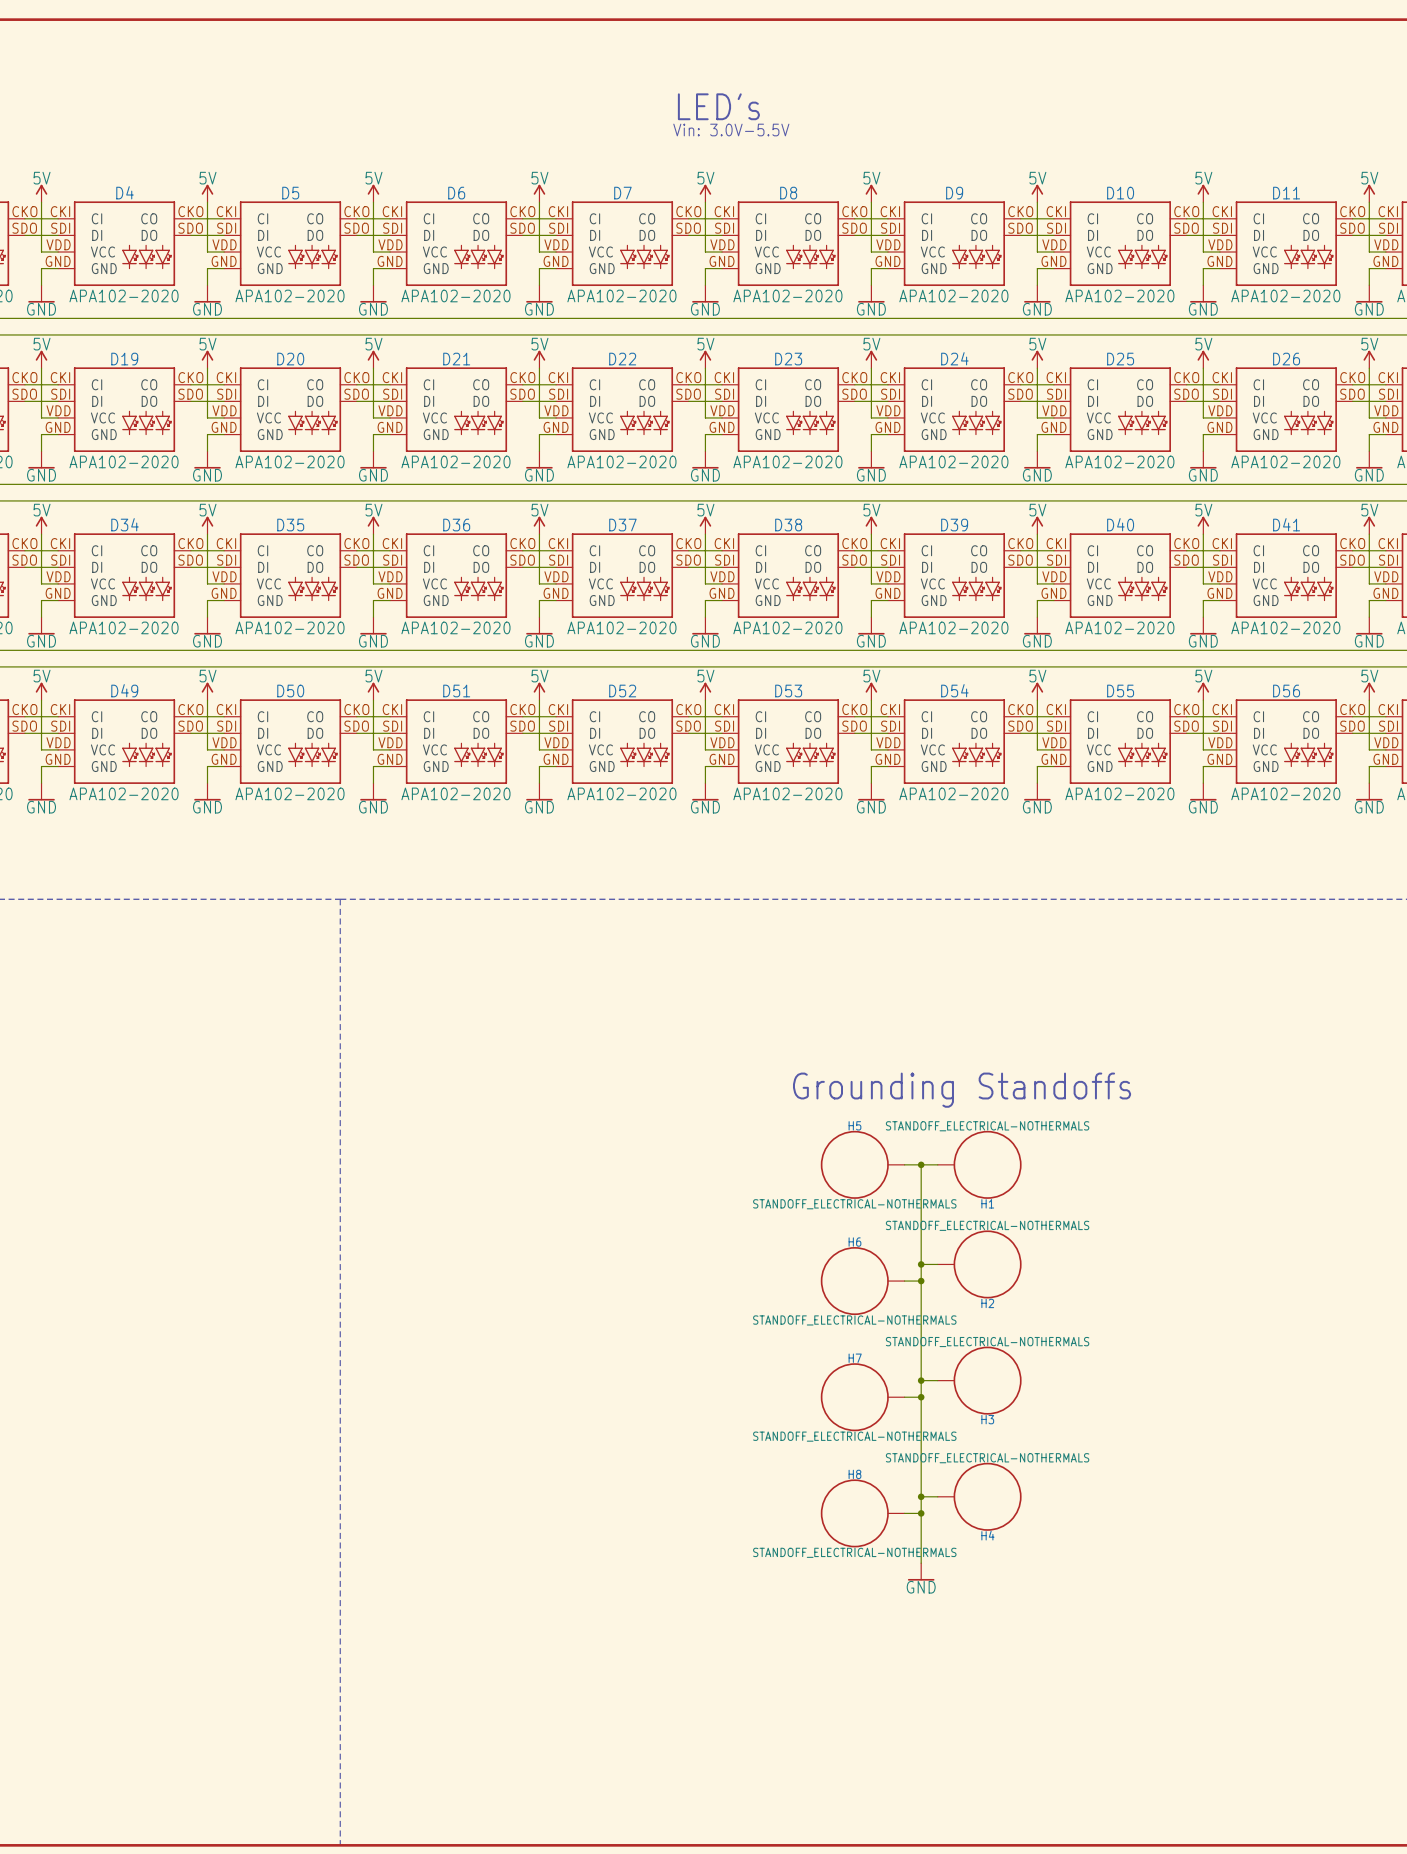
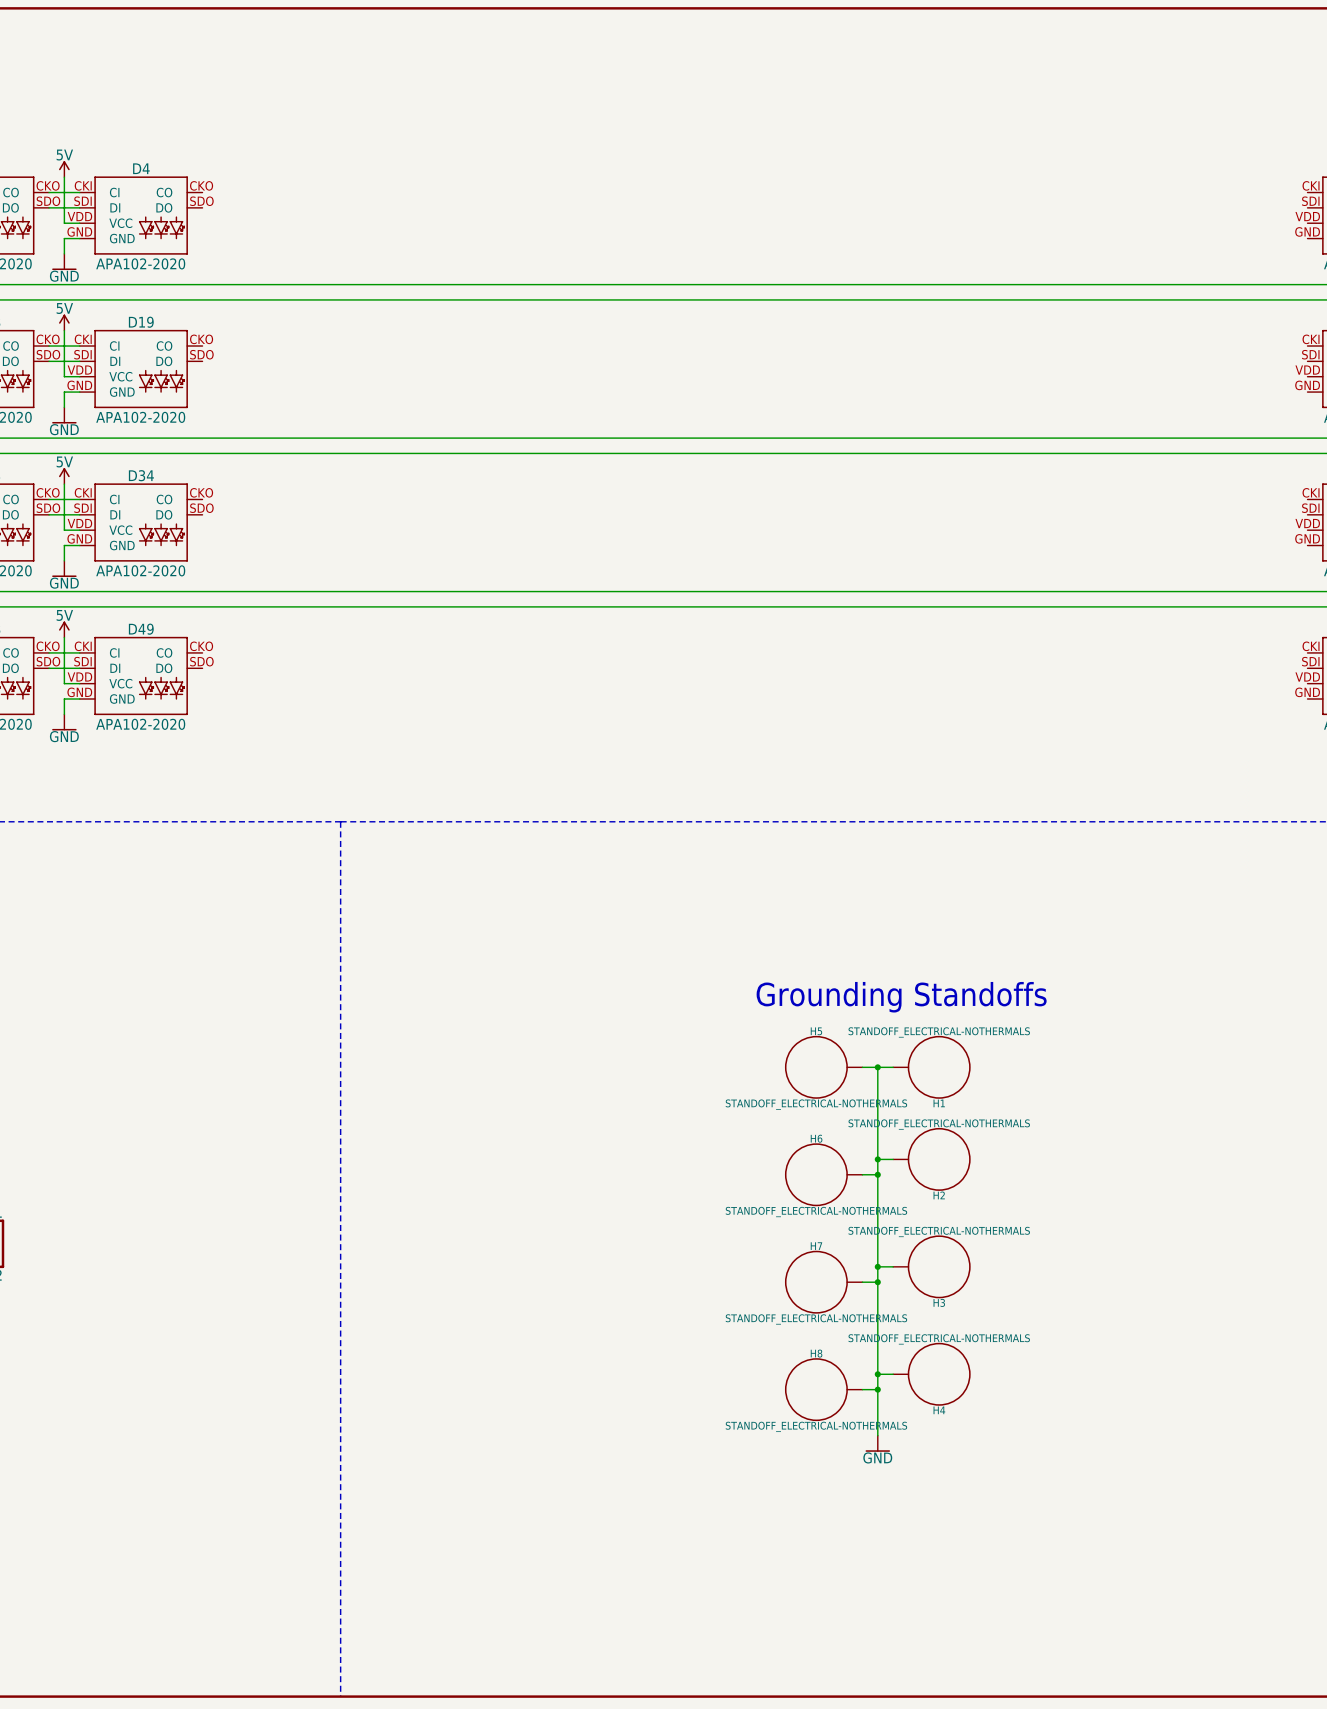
text: LED's (718, 106) -> none
text: Vin: 3.0V-5.5V (731, 130) -> none
power symbol: 5V (207, 193) -> none
power symbol: 5V (373, 193) -> none
power symbol: 5V (539, 193) -> none
power symbol: 5V (705, 193) -> none
power symbol: 5V (871, 193) -> none
power symbol: 5V (1037, 193) -> none
power symbol: 5V (1203, 193) -> none
power symbol: 5V (1369, 193) -> none
wire: (207, 202) (207, 252) (224, 252) -> none
wire: (373, 202) (373, 252) (390, 252) -> none
wire: (539, 202) (539, 252) (556, 252) -> none
wire: (705, 202) (705, 252) (722, 252) -> none
wire: (871, 202) (871, 252) (887, 252) -> none
wire: (1037, 202) (1037, 252) (1053, 252) -> none
wire: (1203, 202) (1203, 252) (1219, 252) -> none
wire: (1369, 202) (1369, 252) (1385, 252) -> none
wire: (190, 218) (224, 218) -> none
wire: (356, 218) (390, 218) -> none
wire: (522, 218) (556, 218) -> none
wire: (688, 218) (722, 218) -> none
wire: (854, 218) (887, 218) -> none
wire: (1020, 218) (1053, 218) -> none
wire: (1186, 218) (1219, 218) -> none
wire: (1352, 218) (1385, 218) -> none
wire: (190, 235) (224, 235) -> none
wire: (356, 235) (390, 235) -> none
wire: (522, 235) (556, 235) -> none
wire: (688, 235) (722, 235) -> none
wire: (854, 235) (887, 235) -> none
wire: (1020, 235) (1053, 235) -> none
wire: (1186, 235) (1219, 235) -> none
wire: (1352, 235) (1385, 235) -> none
D5: APA102-2020 (290, 243) -> none
D6: APA102-2020 (456, 243) -> none
D7: APA102-2020 (622, 243) -> none
D8: APA102-2020 (788, 243) -> none
D9: APA102-2020 (954, 243) -> none
D10: APA102-2020 (1120, 243) -> none
D11: APA102-2020 (1286, 243) -> none
wire: (224, 268) (207, 268) (207, 285) -> none
wire: (390, 268) (373, 268) (373, 285) -> none
wire: (556, 268) (539, 268) (539, 285) -> none
wire: (722, 268) (705, 268) (705, 285) -> none
wire: (887, 268) (871, 268) (871, 285) -> none
wire: (1053, 268) (1037, 268) (1037, 285) -> none
wire: (1219, 268) (1203, 268) (1203, 285) -> none
wire: (1385, 268) (1369, 268) (1369, 285) -> none
power symbol: GND (207, 293) -> none
power symbol: GND (373, 293) -> none
power symbol: GND (539, 293) -> none
power symbol: GND (705, 293) -> none
power symbol: GND (871, 293) -> none
power symbol: GND (1037, 293) -> none
power symbol: GND (1203, 293) -> none
power symbol: GND (1369, 293) -> none
power symbol: 5V (207, 359) -> none
power symbol: 5V (373, 359) -> none
power symbol: 5V (539, 359) -> none
power symbol: 5V (705, 359) -> none
power symbol: 5V (871, 359) -> none
power symbol: 5V (1037, 359) -> none
power symbol: 5V (1203, 359) -> none
power symbol: 5V (1369, 359) -> none
wire: (207, 368) (207, 417) (224, 417) -> none
wire: (373, 368) (373, 417) (390, 417) -> none
wire: (539, 368) (539, 417) (556, 417) -> none
wire: (705, 368) (705, 417) (722, 417) -> none
wire: (871, 368) (871, 417) (887, 417) -> none
wire: (1037, 368) (1037, 417) (1053, 417) -> none
wire: (1203, 368) (1203, 417) (1219, 417) -> none
wire: (1369, 368) (1369, 417) (1385, 417) -> none
wire: (190, 384) (224, 384) -> none
wire: (356, 384) (390, 384) -> none
wire: (522, 384) (556, 384) -> none
wire: (688, 384) (722, 384) -> none
wire: (854, 384) (887, 384) -> none
wire: (1020, 384) (1053, 384) -> none
wire: (1186, 384) (1219, 384) -> none
wire: (1352, 384) (1385, 384) -> none
wire: (190, 401) (224, 401) -> none
wire: (356, 401) (390, 401) -> none
wire: (522, 401) (556, 401) -> none
wire: (688, 401) (722, 401) -> none
wire: (854, 401) (887, 401) -> none
wire: (1020, 401) (1053, 401) -> none
wire: (1186, 401) (1219, 401) -> none
wire: (1352, 401) (1385, 401) -> none
D20: APA102-2020 (290, 409) -> none
D21: APA102-2020 (456, 409) -> none
D22: APA102-2020 (622, 409) -> none
D23: APA102-2020 (788, 409) -> none
D24: APA102-2020 (954, 409) -> none
D25: APA102-2020 (1120, 409) -> none
D26: APA102-2020 (1286, 409) -> none
wire: (224, 434) (207, 434) (207, 451) -> none
wire: (390, 434) (373, 434) (373, 451) -> none
wire: (556, 434) (539, 434) (539, 451) -> none
wire: (722, 434) (705, 434) (705, 451) -> none
wire: (887, 434) (871, 434) (871, 451) -> none
wire: (1053, 434) (1037, 434) (1037, 451) -> none
wire: (1219, 434) (1203, 434) (1203, 451) -> none
wire: (1385, 434) (1369, 434) (1369, 451) -> none
power symbol: GND (207, 459) -> none
power symbol: GND (373, 459) -> none
power symbol: GND (539, 459) -> none
power symbol: GND (705, 459) -> none
power symbol: GND (871, 459) -> none
power symbol: GND (1037, 459) -> none
power symbol: GND (1203, 459) -> none
power symbol: GND (1369, 459) -> none
power symbol: 5V (207, 525) -> none
power symbol: 5V (373, 525) -> none
power symbol: 5V (539, 525) -> none
power symbol: 5V (705, 525) -> none
power symbol: 5V (871, 525) -> none
power symbol: 5V (1037, 525) -> none
power symbol: 5V (1203, 525) -> none
power symbol: 5V (1369, 525) -> none
wire: (207, 534) (207, 583) (224, 583) -> none
wire: (373, 534) (373, 583) (390, 583) -> none
wire: (539, 534) (539, 583) (556, 583) -> none
wire: (705, 534) (705, 583) (722, 583) -> none
wire: (871, 534) (871, 583) (887, 583) -> none
wire: (1037, 534) (1037, 583) (1053, 583) -> none
wire: (1203, 534) (1203, 583) (1219, 583) -> none
wire: (1369, 534) (1369, 583) (1385, 583) -> none
wire: (190, 550) (224, 550) -> none
wire: (356, 550) (390, 550) -> none
wire: (522, 550) (556, 550) -> none
wire: (688, 550) (722, 550) -> none
wire: (854, 550) (887, 550) -> none
wire: (1020, 550) (1053, 550) -> none
wire: (1186, 550) (1219, 550) -> none
wire: (1352, 550) (1385, 550) -> none
wire: (190, 567) (224, 567) -> none
wire: (356, 567) (390, 567) -> none
wire: (522, 567) (556, 567) -> none
wire: (688, 567) (722, 567) -> none
wire: (854, 567) (887, 567) -> none
wire: (1020, 567) (1053, 567) -> none
wire: (1186, 567) (1219, 567) -> none
wire: (1352, 567) (1385, 567) -> none
D35: APA102-2020 (290, 575) -> none
D36: APA102-2020 (456, 575) -> none
D37: APA102-2020 (622, 575) -> none
D38: APA102-2020 (788, 575) -> none
D39: APA102-2020 (954, 575) -> none
D40: APA102-2020 (1120, 575) -> none
D41: APA102-2020 (1286, 575) -> none
wire: (224, 600) (207, 600) (207, 617) -> none
wire: (390, 600) (373, 600) (373, 617) -> none
wire: (556, 600) (539, 600) (539, 617) -> none
wire: (722, 600) (705, 600) (705, 617) -> none
wire: (887, 600) (871, 600) (871, 617) -> none
wire: (1053, 600) (1037, 600) (1037, 617) -> none
wire: (1219, 600) (1203, 600) (1203, 617) -> none
wire: (1385, 600) (1369, 600) (1369, 617) -> none
power symbol: GND (207, 625) -> none
power symbol: GND (373, 625) -> none
power symbol: GND (539, 625) -> none
power symbol: GND (705, 625) -> none
power symbol: GND (871, 625) -> none
power symbol: GND (1037, 625) -> none
power symbol: GND (1203, 625) -> none
power symbol: GND (1369, 625) -> none
power symbol: 5V (207, 691) -> none
power symbol: 5V (373, 691) -> none
power symbol: 5V (539, 691) -> none
power symbol: 5V (705, 691) -> none
power symbol: 5V (871, 691) -> none
power symbol: 5V (1037, 691) -> none
power symbol: 5V (1203, 691) -> none
power symbol: 5V (1369, 691) -> none
wire: (207, 700) (207, 749) (224, 749) -> none
wire: (373, 700) (373, 749) (390, 749) -> none
wire: (539, 700) (539, 749) (556, 749) -> none
wire: (705, 700) (705, 749) (722, 749) -> none
wire: (871, 700) (871, 749) (887, 749) -> none
wire: (1037, 700) (1037, 749) (1053, 749) -> none
wire: (1203, 700) (1203, 749) (1219, 749) -> none
wire: (1369, 700) (1369, 749) (1385, 749) -> none
wire: (190, 716) (224, 716) -> none
wire: (356, 716) (390, 716) -> none
wire: (522, 716) (556, 716) -> none
wire: (688, 716) (722, 716) -> none
wire: (854, 716) (887, 716) -> none
wire: (1020, 716) (1053, 716) -> none
wire: (1186, 716) (1219, 716) -> none
wire: (1352, 716) (1385, 716) -> none
wire: (190, 733) (224, 733) -> none
wire: (356, 733) (390, 733) -> none
wire: (522, 733) (556, 733) -> none
wire: (688, 733) (722, 733) -> none
wire: (854, 733) (887, 733) -> none
wire: (1020, 733) (1053, 733) -> none
wire: (1186, 733) (1219, 733) -> none
wire: (1352, 733) (1385, 733) -> none
D50: APA102-2020 (290, 741) -> none
D51: APA102-2020 (456, 741) -> none
D52: APA102-2020 (622, 741) -> none
D53: APA102-2020 (788, 741) -> none
D54: APA102-2020 (954, 741) -> none
D55: APA102-2020 (1120, 741) -> none
D56: APA102-2020 (1286, 741) -> none
wire: (224, 766) (207, 766) (207, 783) -> none
wire: (390, 766) (373, 766) (373, 783) -> none
wire: (556, 766) (539, 766) (539, 783) -> none
wire: (722, 766) (705, 766) (705, 783) -> none
wire: (887, 766) (871, 766) (871, 783) -> none
wire: (1053, 766) (1037, 766) (1037, 783) -> none
wire: (1219, 766) (1203, 766) (1203, 783) -> none
wire: (1385, 766) (1369, 766) (1369, 783) -> none
power symbol: GND (207, 791) -> none
power symbol: GND (373, 791) -> none
power symbol: GND (539, 791) -> none
power symbol: GND (705, 791) -> none
power symbol: GND (871, 791) -> none
power symbol: GND (1037, 791) -> none
power symbol: GND (1203, 791) -> none
power symbol: GND (1369, 791) -> none

